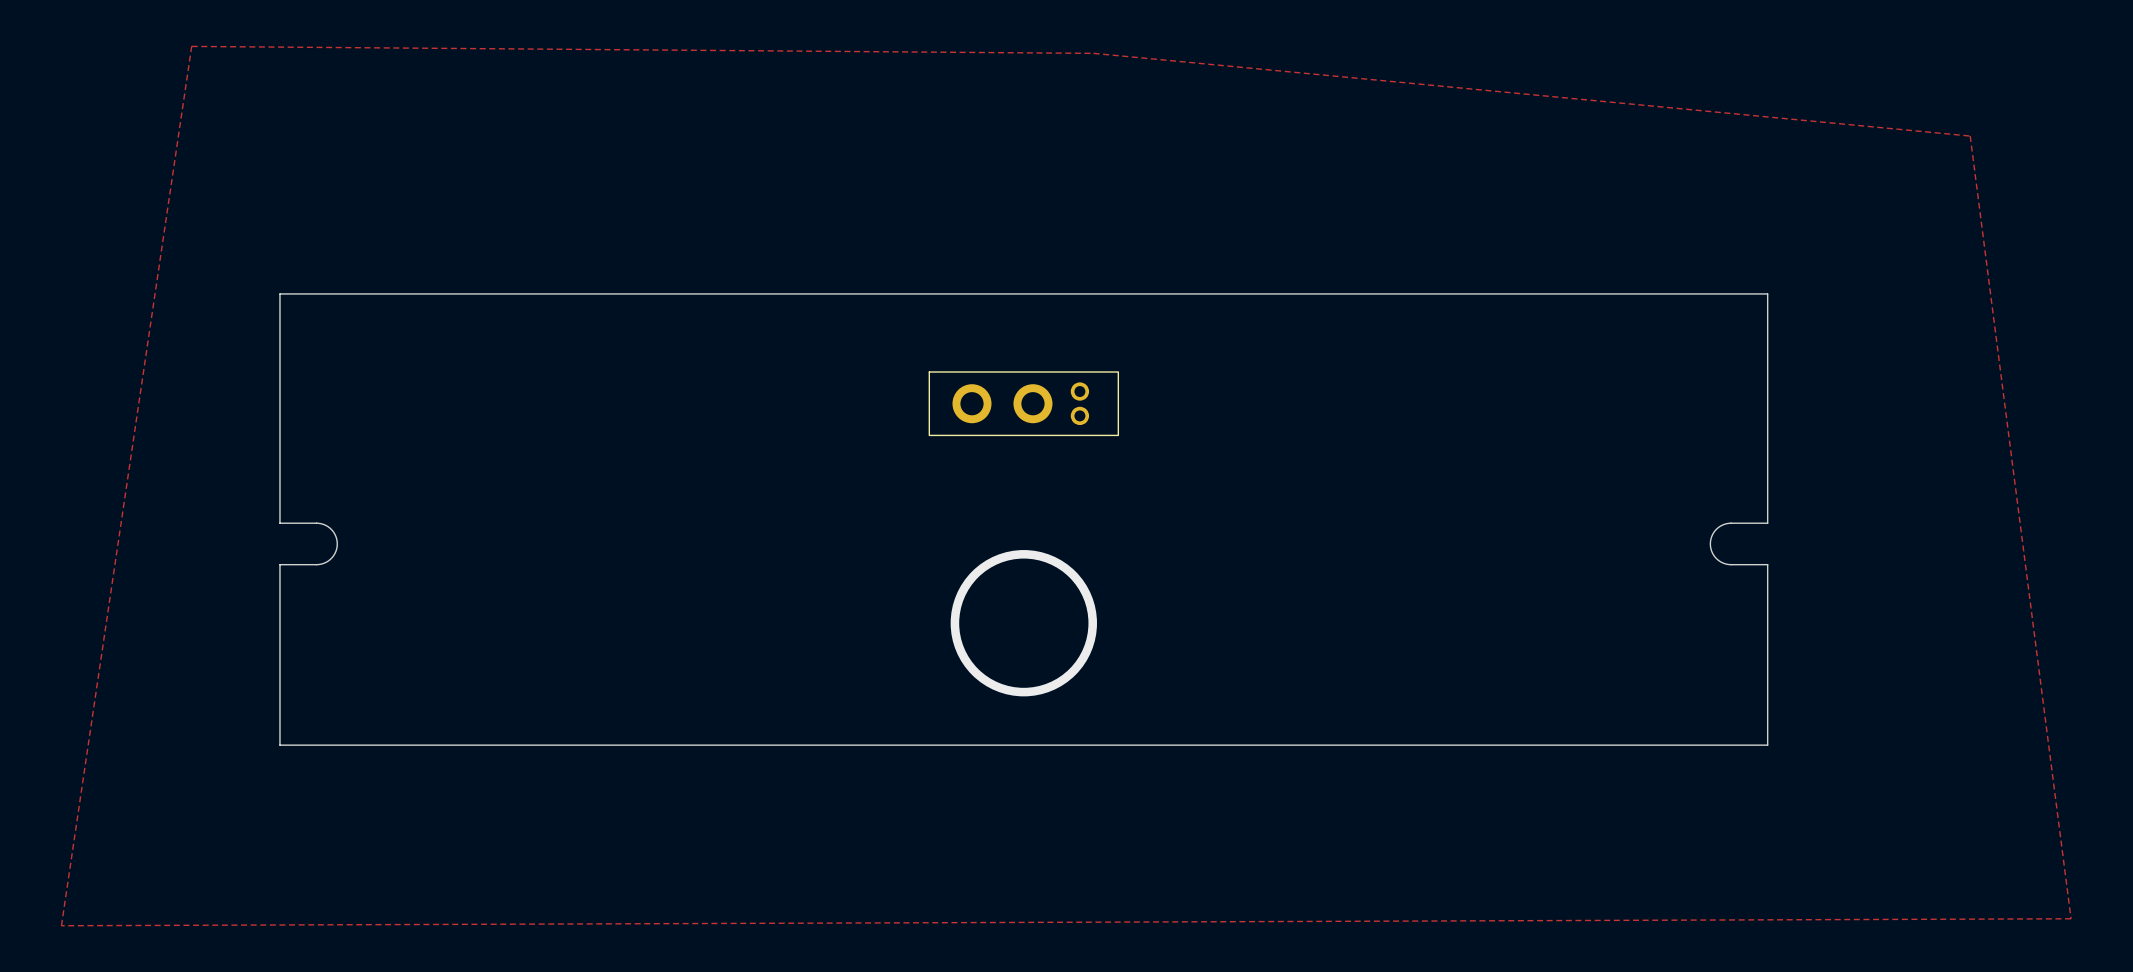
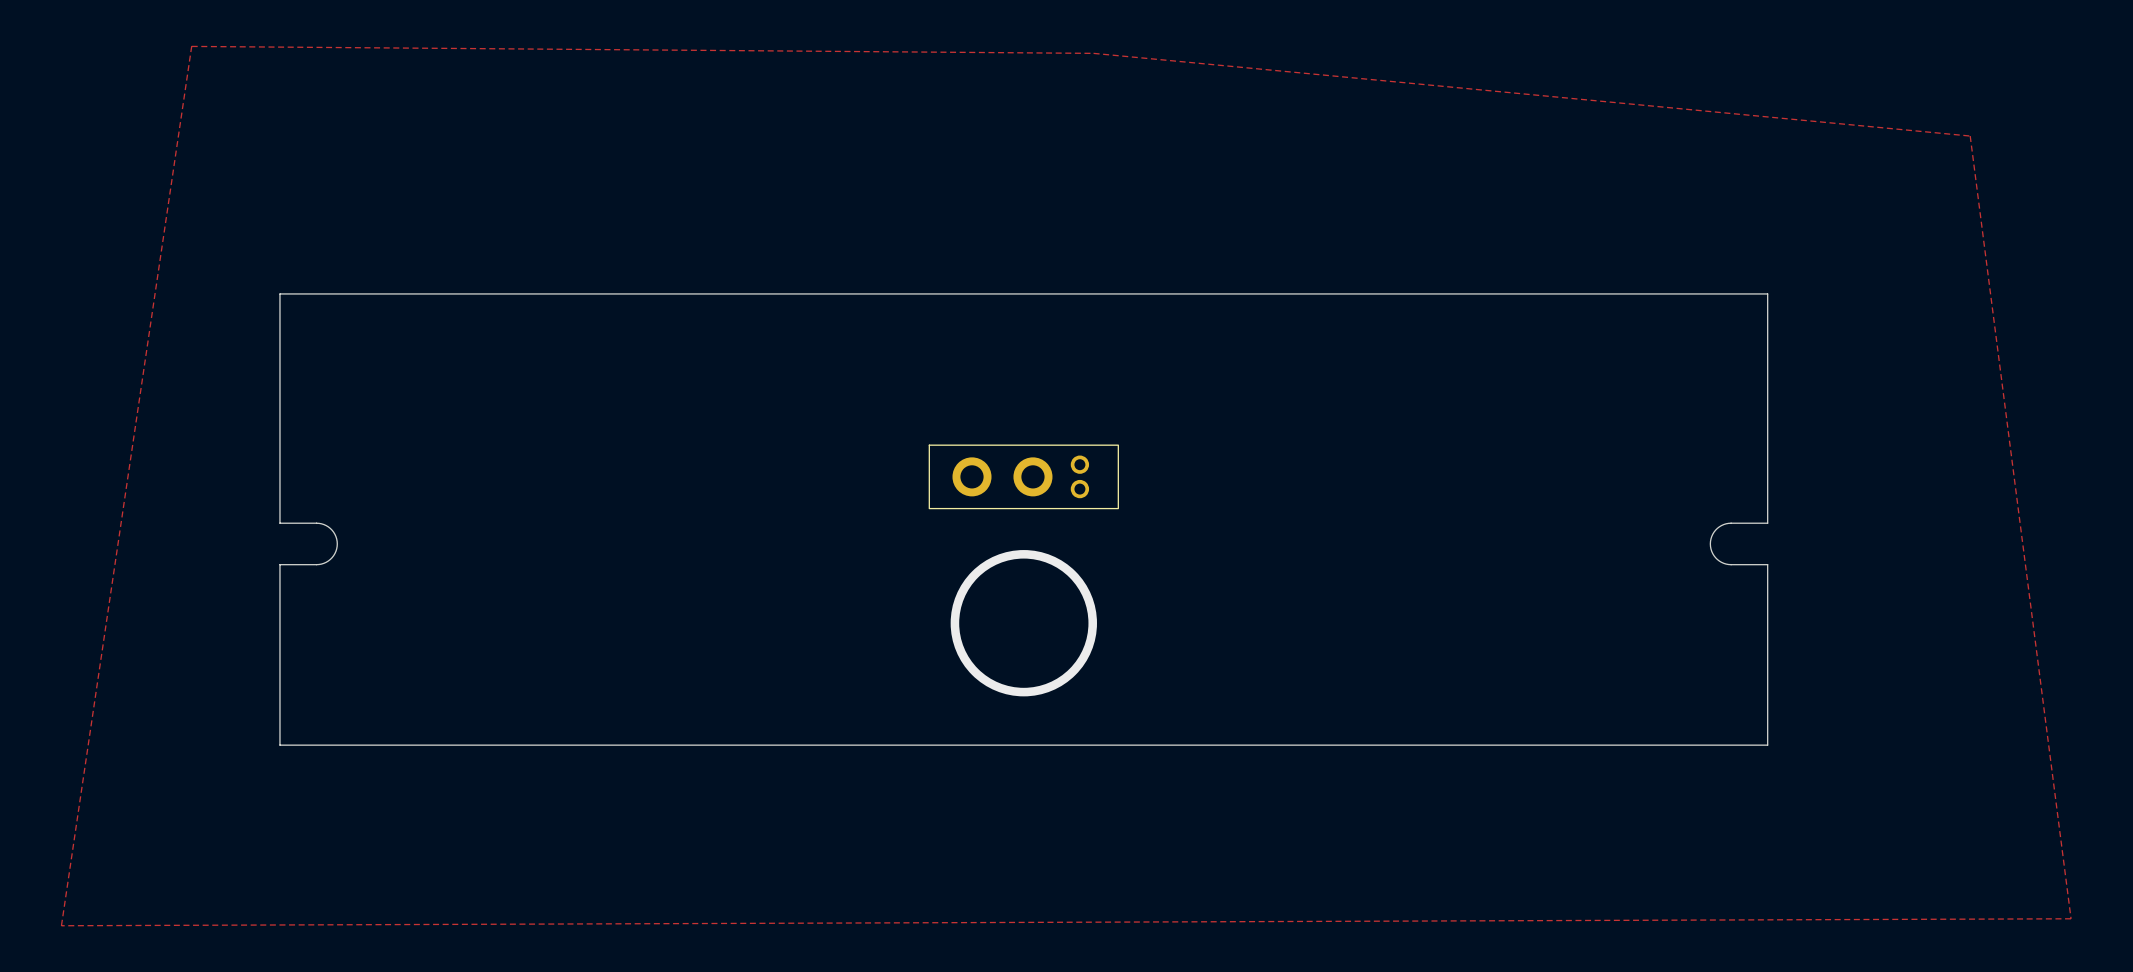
part position: (1023, 403) -> (1023, 476)

